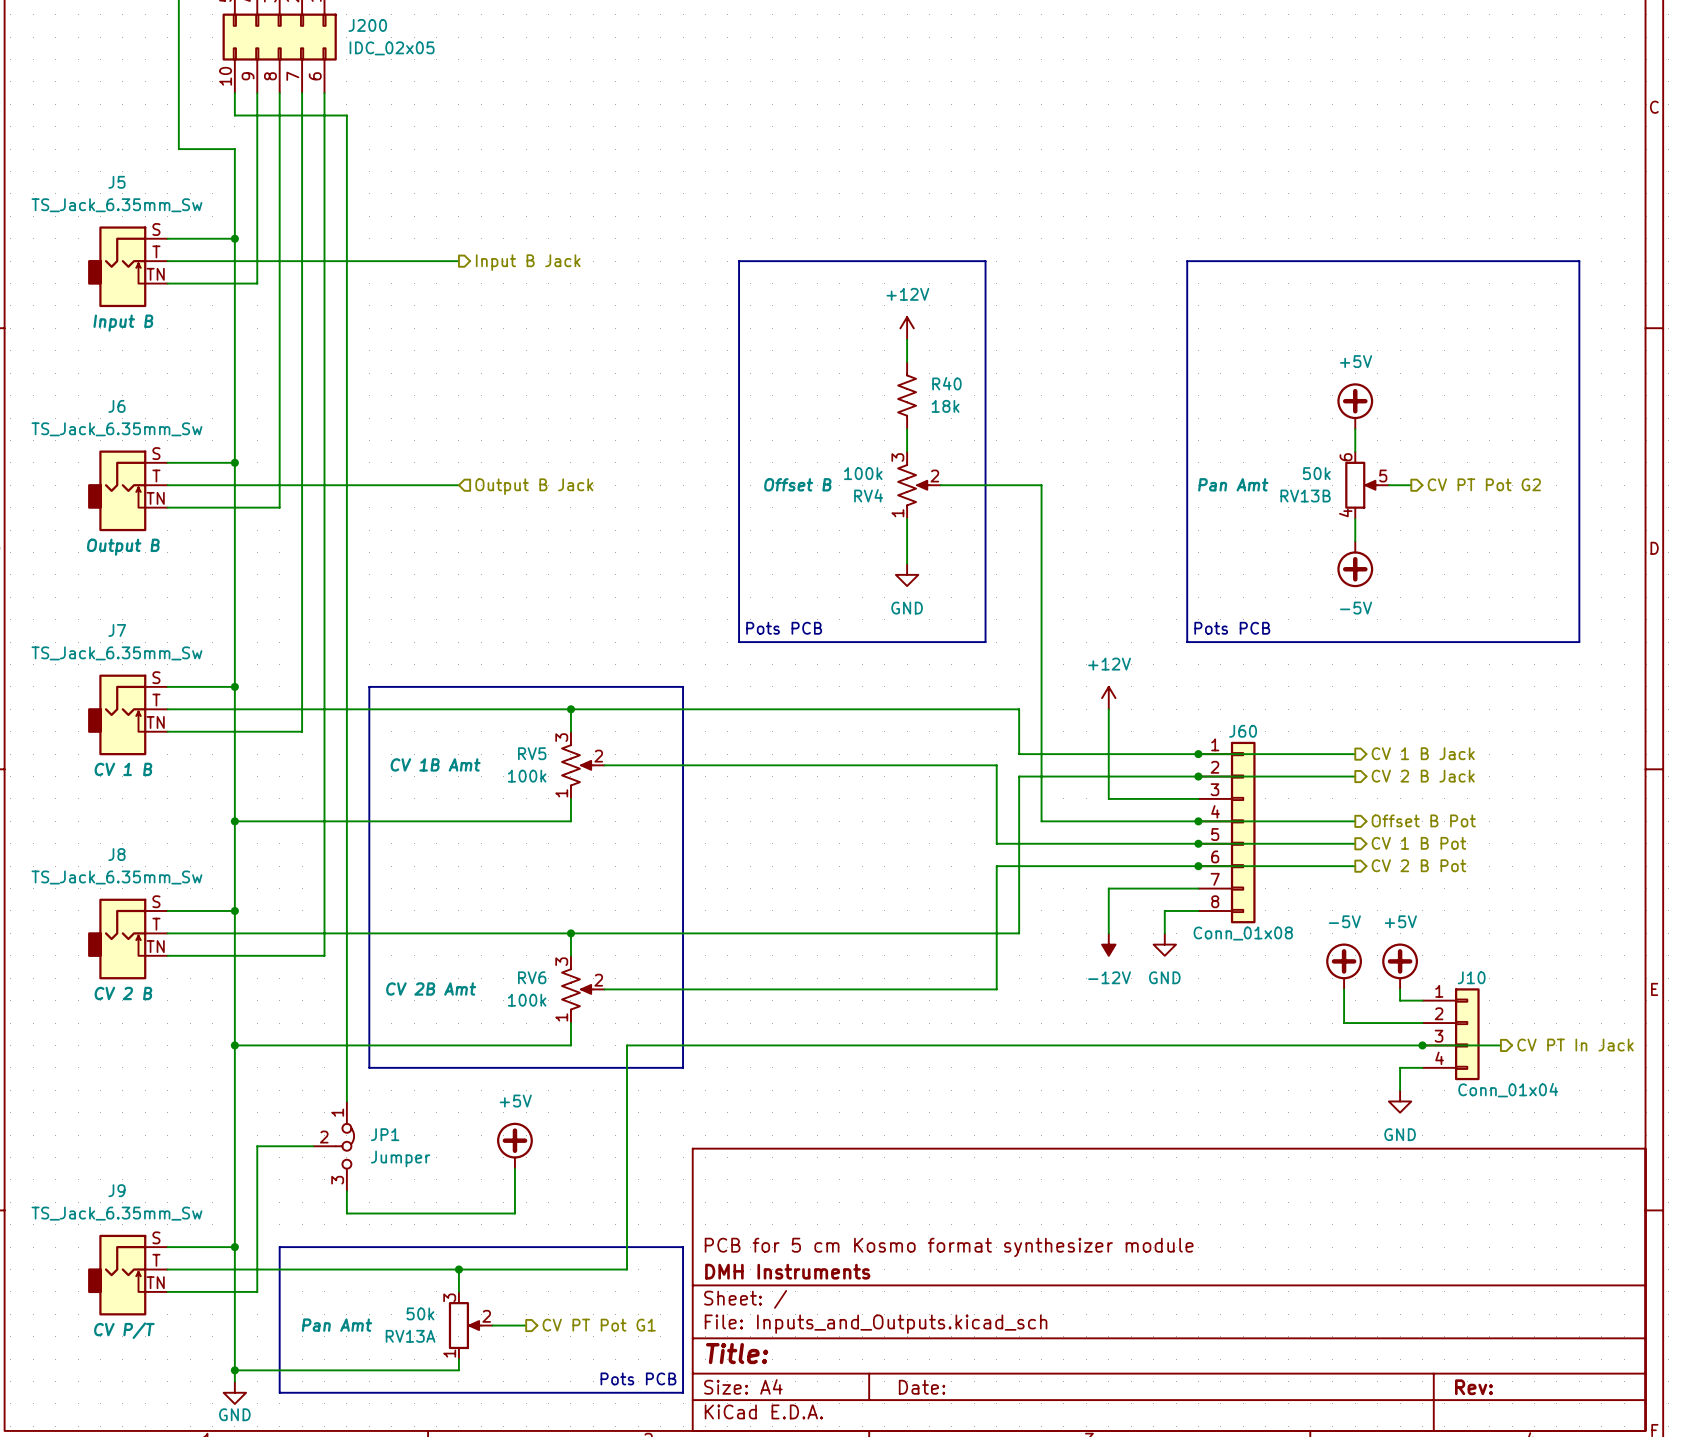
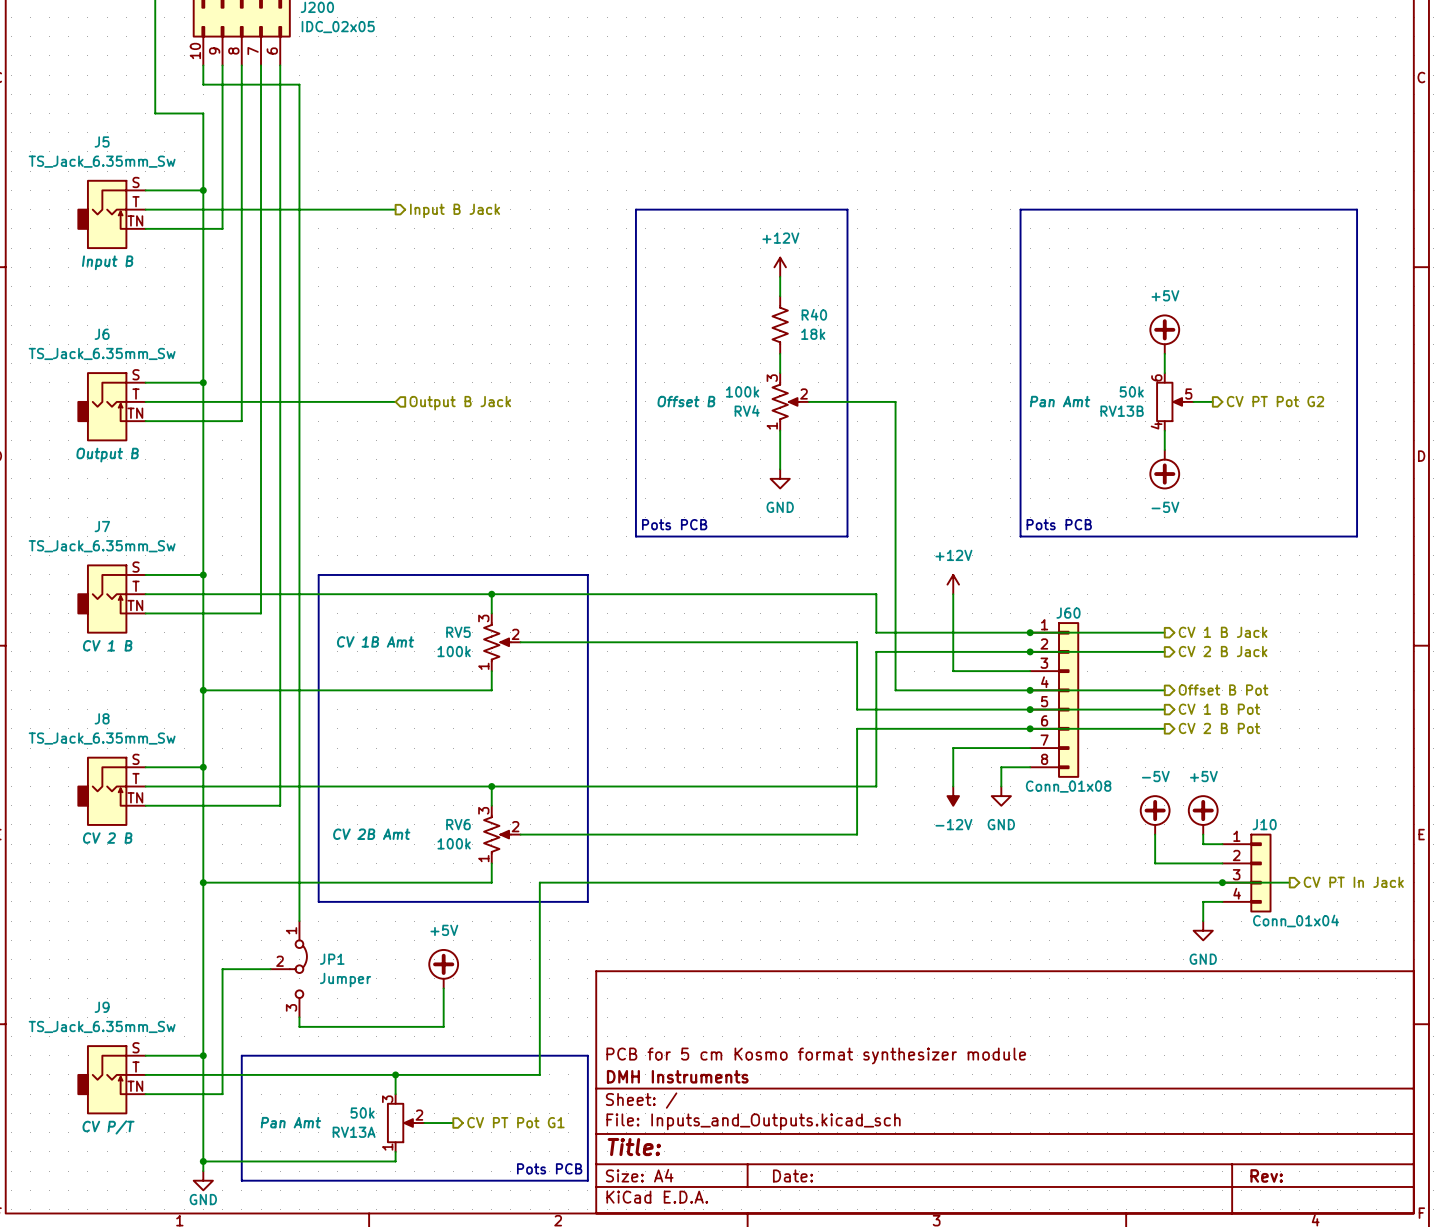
JP1 symbol: [313, 1101, 355, 1192] -> [270, 921, 307, 1018]

